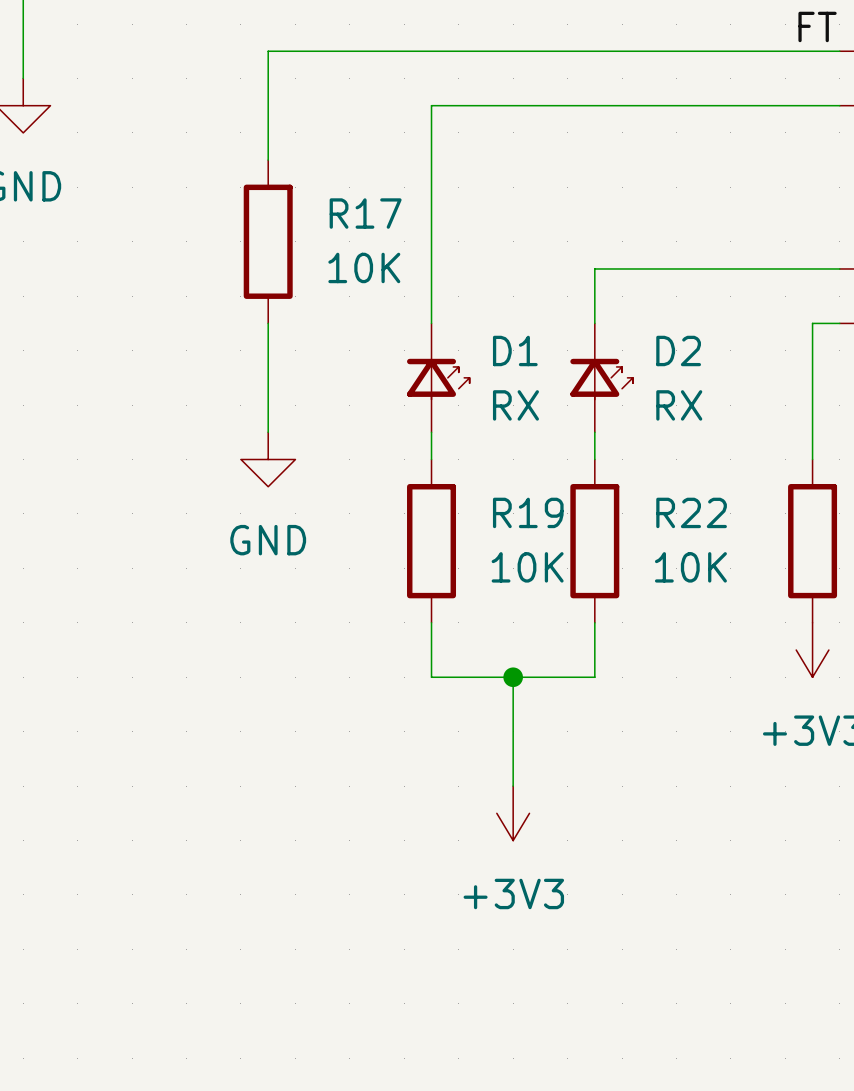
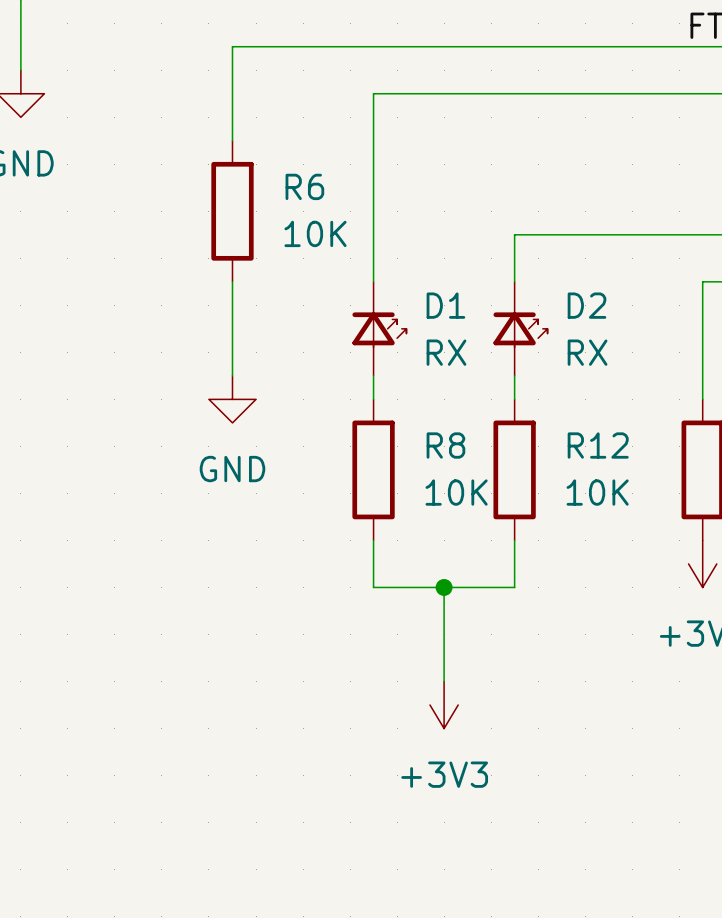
R17 name: R17 (365, 213) -> R6 (304, 186)
R19 name: R19 (528, 512) -> R8 (445, 445)
R22 name: R22 (691, 512) -> R12 (598, 445)

